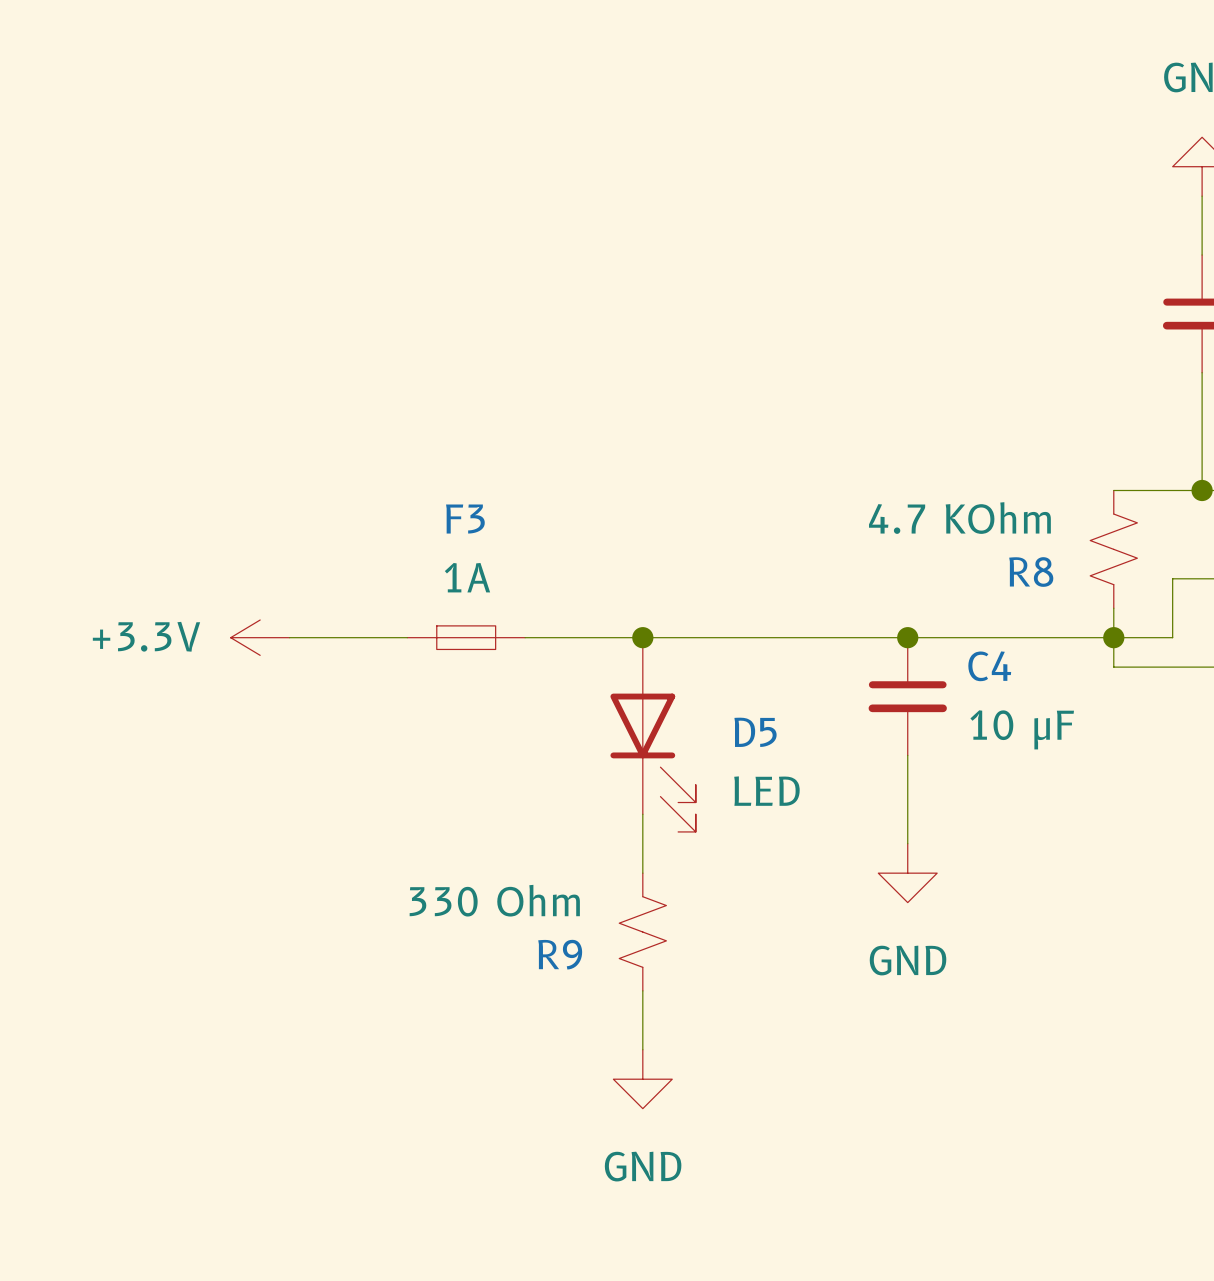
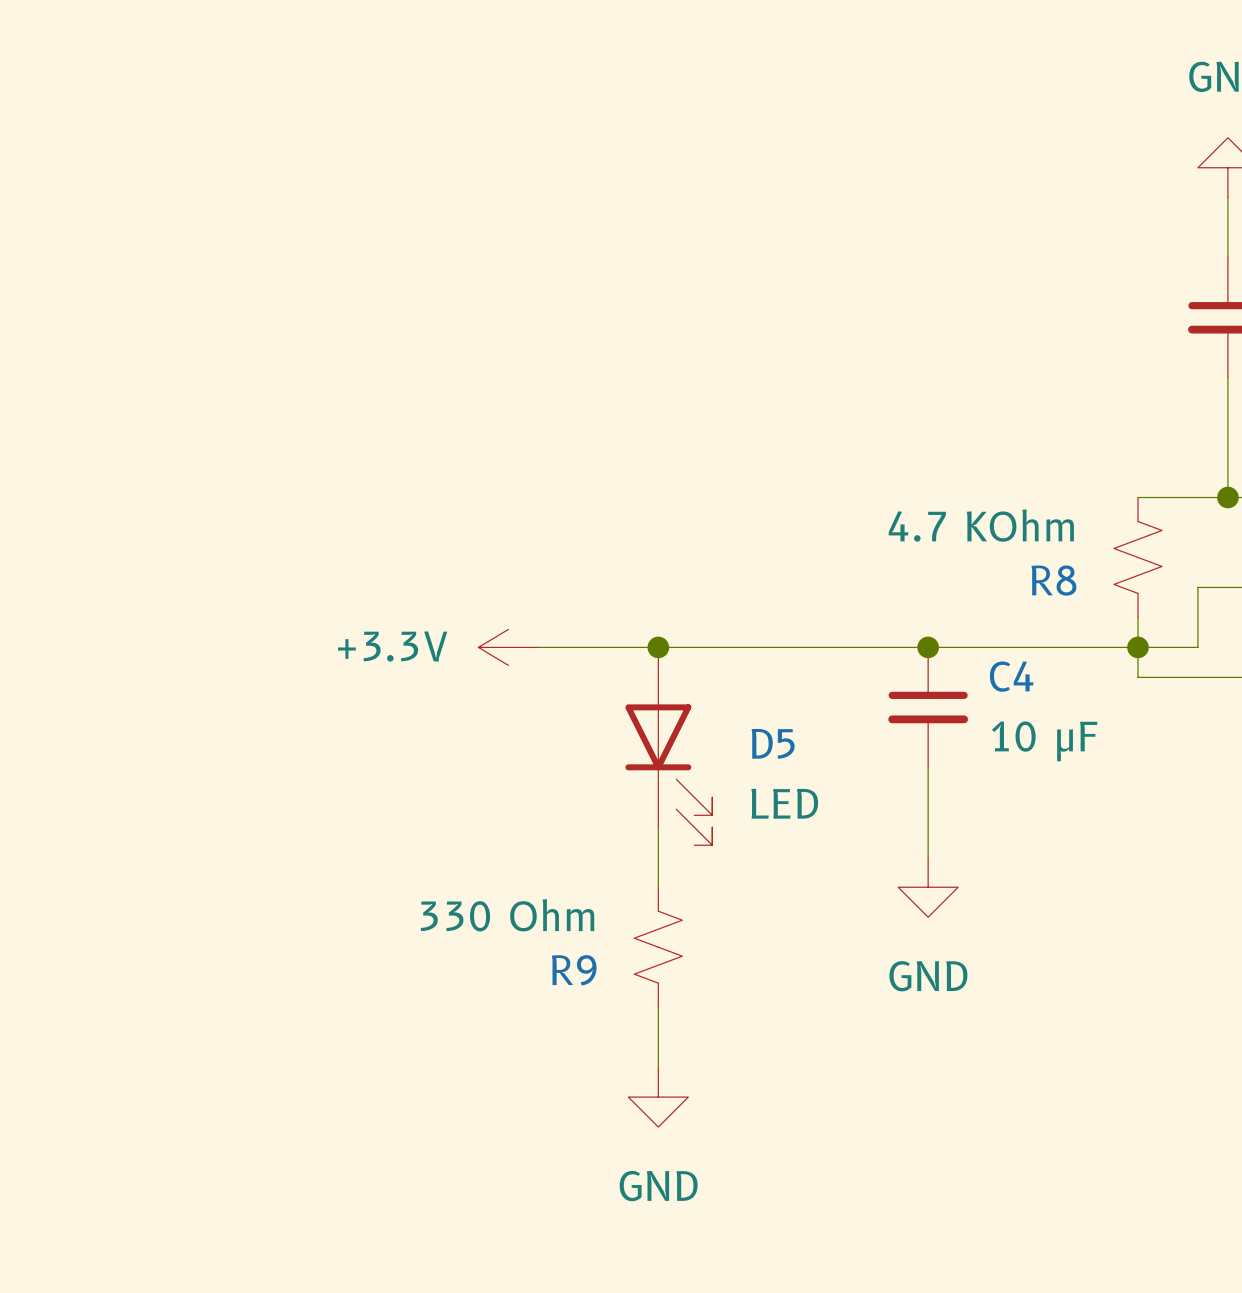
power symbol position: +3.3V (260, 637) -> +3.3V (508, 647)
wire: (289, 637) (407, 637) -> none
F3: 1A (466, 637) -> none

